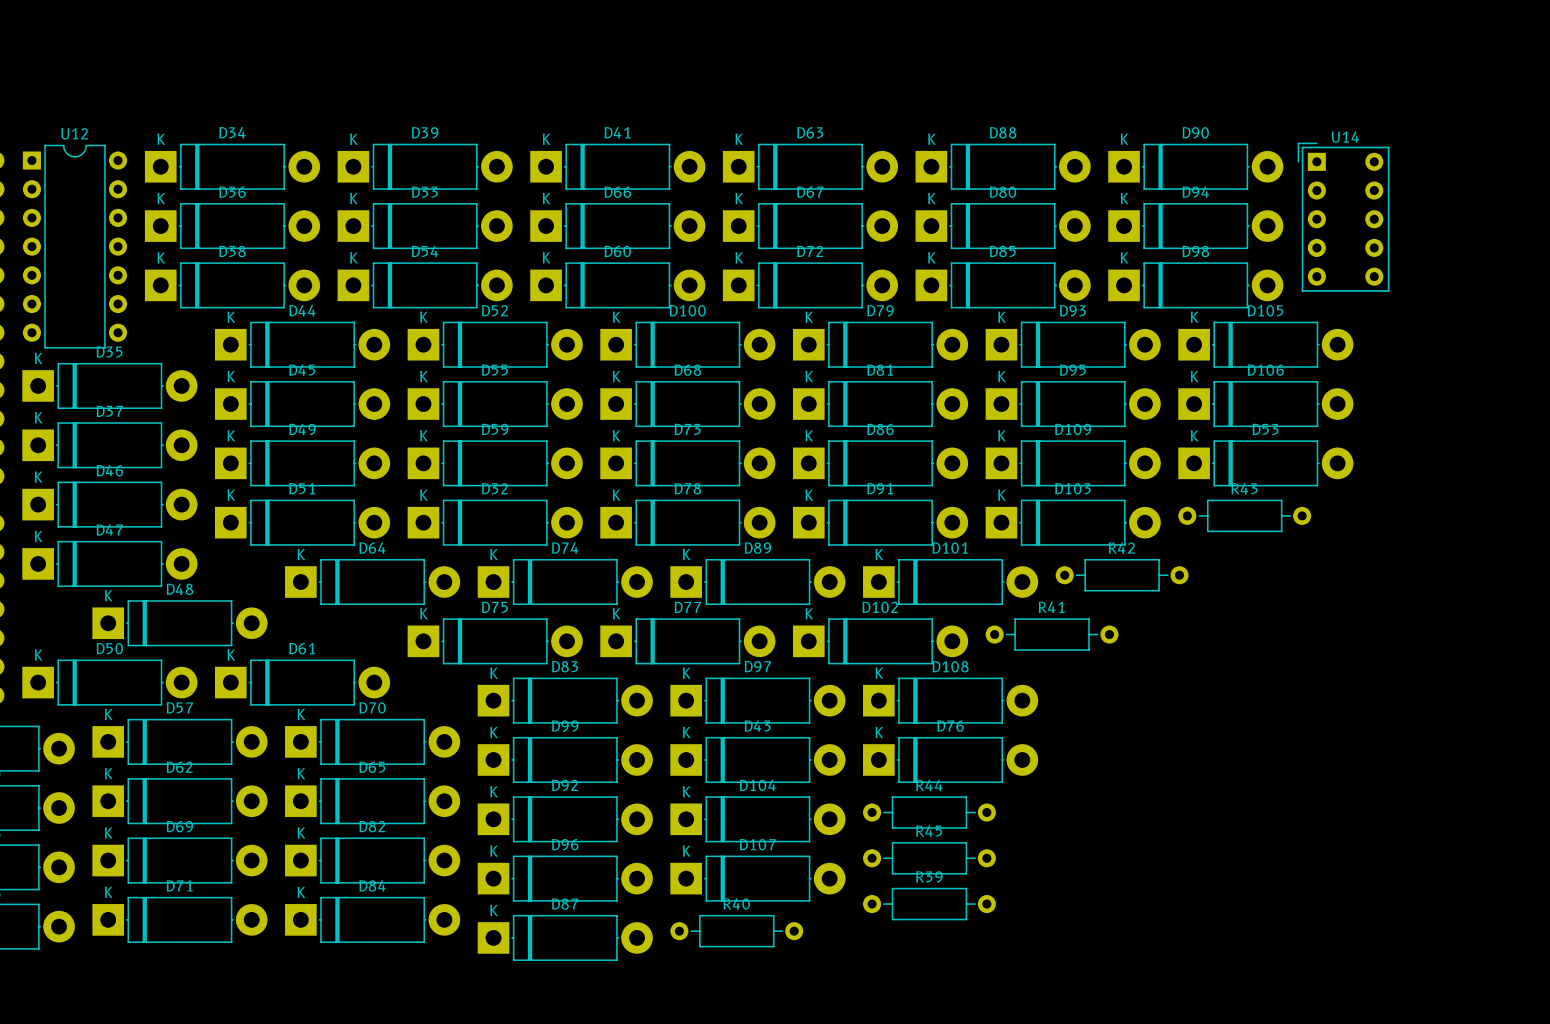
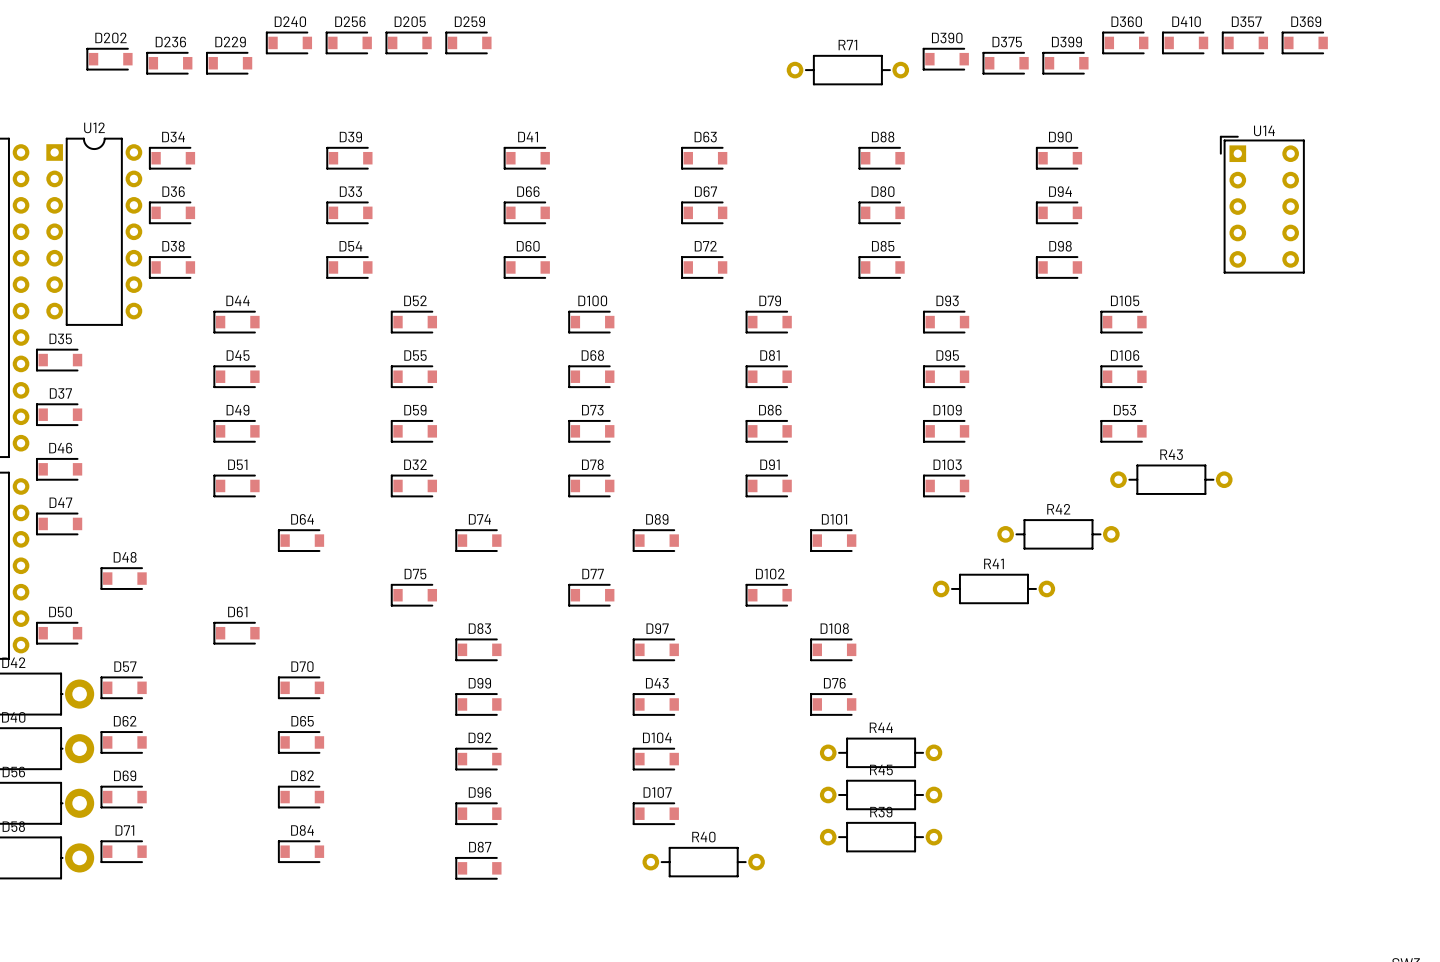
D240: none -> (289, 42)
D256: none -> (348, 42)
D205: none -> (408, 42)
D259: none -> (468, 42)
D360: none -> (1125, 42)
D410: none -> (1185, 42)
D357: none -> (1245, 42)
D369: none -> (1304, 42)
D202: none -> (109, 59)
D390: none -> (945, 59)
D236: none -> (169, 63)
D229: none -> (229, 63)
D375: none -> (1005, 63)
D399: none -> (1065, 63)
R71: none -> (847, 70)
D34 footprint: [144, 143, 321, 190] -> [149, 147, 196, 170]
D39 footprint: [337, 143, 513, 190] -> [326, 147, 373, 170]
D41 footprint: [530, 143, 706, 190] -> [504, 147, 550, 170]
D63 footprint: [722, 143, 899, 190] -> [681, 147, 728, 170]
D88 footprint: [915, 143, 1091, 190] -> [858, 147, 905, 170]
D90 footprint: [1108, 143, 1284, 190] -> [1036, 147, 1083, 170]
D36 footprint: [144, 203, 321, 250] -> [149, 201, 196, 224]
D33 footprint: [337, 203, 513, 250] -> [326, 201, 373, 224]
D66 footprint: [530, 203, 706, 250] -> [504, 201, 550, 224]
D67 footprint: [722, 203, 899, 250] -> [681, 201, 728, 224]
D80 footprint: [915, 203, 1091, 250] -> [858, 201, 905, 224]
D94 footprint: [1108, 203, 1284, 250] -> [1036, 201, 1083, 224]
D38 footprint: [144, 262, 321, 309] -> [149, 256, 196, 279]
D54 footprint: [337, 262, 513, 309] -> [326, 256, 373, 279]
D60 footprint: [530, 262, 706, 309] -> [504, 256, 550, 279]
D72 footprint: [722, 262, 899, 309] -> [681, 256, 728, 279]
D85 footprint: [915, 262, 1091, 309] -> [858, 256, 905, 279]
D98 footprint: [1108, 262, 1284, 309] -> [1036, 256, 1083, 279]
D44 footprint: [214, 321, 391, 368] -> [213, 311, 260, 334]
D52 footprint: [407, 321, 583, 368] -> [391, 311, 438, 334]
D100 footprint: [600, 321, 776, 368] -> [568, 311, 615, 334]
D79 footprint: [792, 321, 969, 368] -> [745, 311, 792, 334]
D93 footprint: [985, 321, 1161, 368] -> [923, 311, 970, 334]
D105 footprint: [1178, 321, 1354, 368] -> [1100, 311, 1147, 334]
D35 footprint: [22, 363, 198, 409] -> [36, 349, 83, 372]
D45 footprint: [214, 381, 391, 427] -> [213, 365, 260, 388]
D55 footprint: [407, 381, 583, 427] -> [391, 365, 438, 388]
D68 footprint: [600, 381, 776, 427] -> [568, 365, 615, 388]
D81 footprint: [792, 381, 969, 427] -> [745, 365, 792, 388]
D95 footprint: [985, 381, 1161, 427] -> [923, 365, 970, 388]
D106 footprint: [1178, 381, 1354, 427] -> [1100, 365, 1147, 388]
D37 footprint: [22, 422, 198, 469] -> [36, 403, 83, 426]
D49 footprint: [214, 440, 391, 487] -> [213, 420, 260, 443]
D59 footprint: [407, 440, 583, 487] -> [391, 420, 438, 443]
D73 footprint: [600, 440, 776, 487] -> [568, 420, 615, 443]
D86 footprint: [792, 440, 969, 487] -> [745, 420, 792, 443]
D109 footprint: [985, 440, 1161, 487] -> [923, 420, 970, 443]
D53 footprint: [1178, 440, 1354, 487] -> [1100, 420, 1147, 443]
D46 footprint: [22, 481, 198, 528] -> [36, 458, 83, 481]
D51 footprint: [214, 499, 391, 546] -> [213, 474, 260, 497]
D32 footprint: [407, 499, 583, 546] -> [391, 474, 438, 497]
D78 footprint: [600, 499, 776, 546] -> [568, 474, 615, 497]
D91 footprint: [792, 499, 969, 546] -> [745, 474, 792, 497]
D103 footprint: [985, 499, 1161, 546] -> [923, 474, 970, 497]
D47 footprint: [22, 540, 198, 587] -> [36, 512, 83, 535]
D64 footprint: [285, 559, 461, 605] -> [278, 529, 325, 552]
D74 footprint: [477, 559, 653, 605] -> [455, 529, 502, 552]
D89 footprint: [670, 559, 846, 605] -> [633, 529, 679, 552]
D101 footprint: [863, 559, 1039, 605] -> [810, 529, 857, 552]
D48 footprint: [92, 600, 268, 647] -> [100, 567, 147, 590]
D75 footprint: [407, 618, 583, 665] -> [391, 584, 438, 607]
D77 footprint: [600, 618, 776, 665] -> [568, 584, 615, 607]
D102 footprint: [792, 618, 969, 665] -> [745, 584, 792, 607]
D50 footprint: [22, 659, 198, 706] -> [36, 622, 83, 645]
D61 footprint: [214, 659, 391, 706] -> [213, 622, 260, 645]
D83 footprint: [477, 677, 653, 724] -> [455, 638, 502, 661]
D97 footprint: [670, 677, 846, 724] -> [633, 638, 679, 661]
D108 footprint: [863, 677, 1039, 724] -> [810, 638, 857, 661]
D57 footprint: [92, 718, 268, 765] -> [100, 676, 147, 699]
D70 footprint: [285, 718, 461, 765] -> [278, 676, 325, 699]
D99 footprint: [477, 737, 653, 783] -> [455, 693, 502, 716]
D43 footprint: [670, 737, 846, 783] -> [633, 693, 679, 716]
D76 footprint: [863, 737, 1039, 783] -> [810, 693, 857, 716]
D62 footprint: [92, 778, 268, 825] -> [100, 731, 147, 754]
D65 footprint: [285, 778, 461, 825] -> [278, 731, 325, 754]
D92 footprint: [477, 796, 653, 843] -> [455, 748, 502, 771]
D104 footprint: [670, 796, 846, 843] -> [633, 748, 679, 771]
D69 footprint: [92, 837, 268, 884] -> [100, 786, 147, 809]
D82 footprint: [285, 837, 461, 884] -> [278, 786, 325, 809]
D96 footprint: [477, 855, 653, 902] -> [455, 802, 502, 825]
D107 footprint: [670, 855, 846, 902] -> [633, 802, 679, 825]
D71 footprint: [92, 896, 268, 943] -> [100, 840, 147, 863]
D84 footprint: [285, 896, 461, 943] -> [278, 840, 325, 863]
D87 footprint: [477, 915, 653, 961] -> [455, 857, 502, 880]

